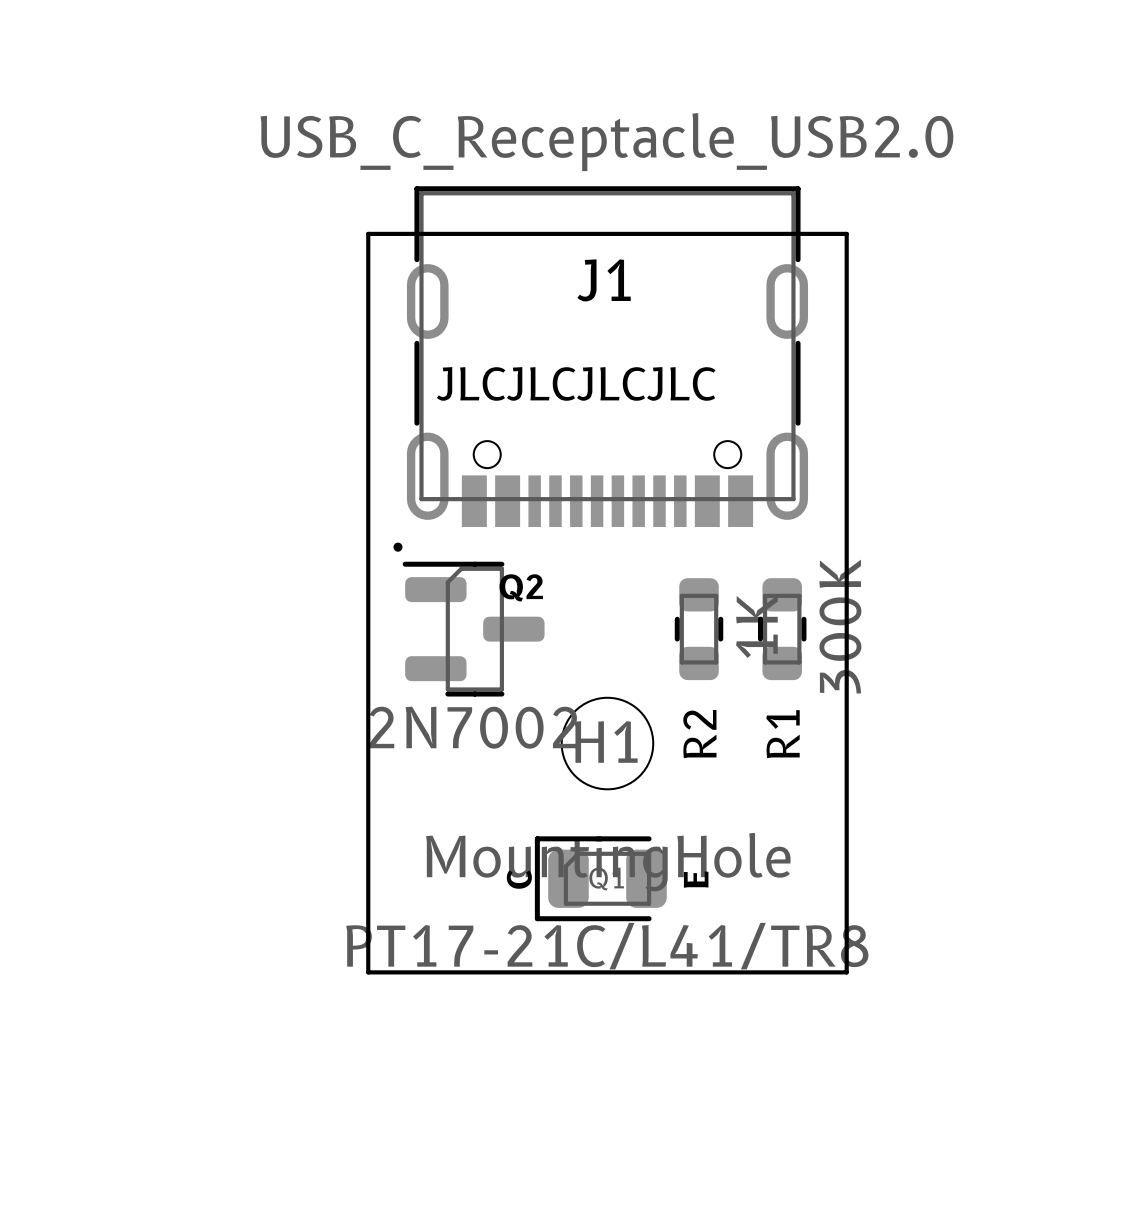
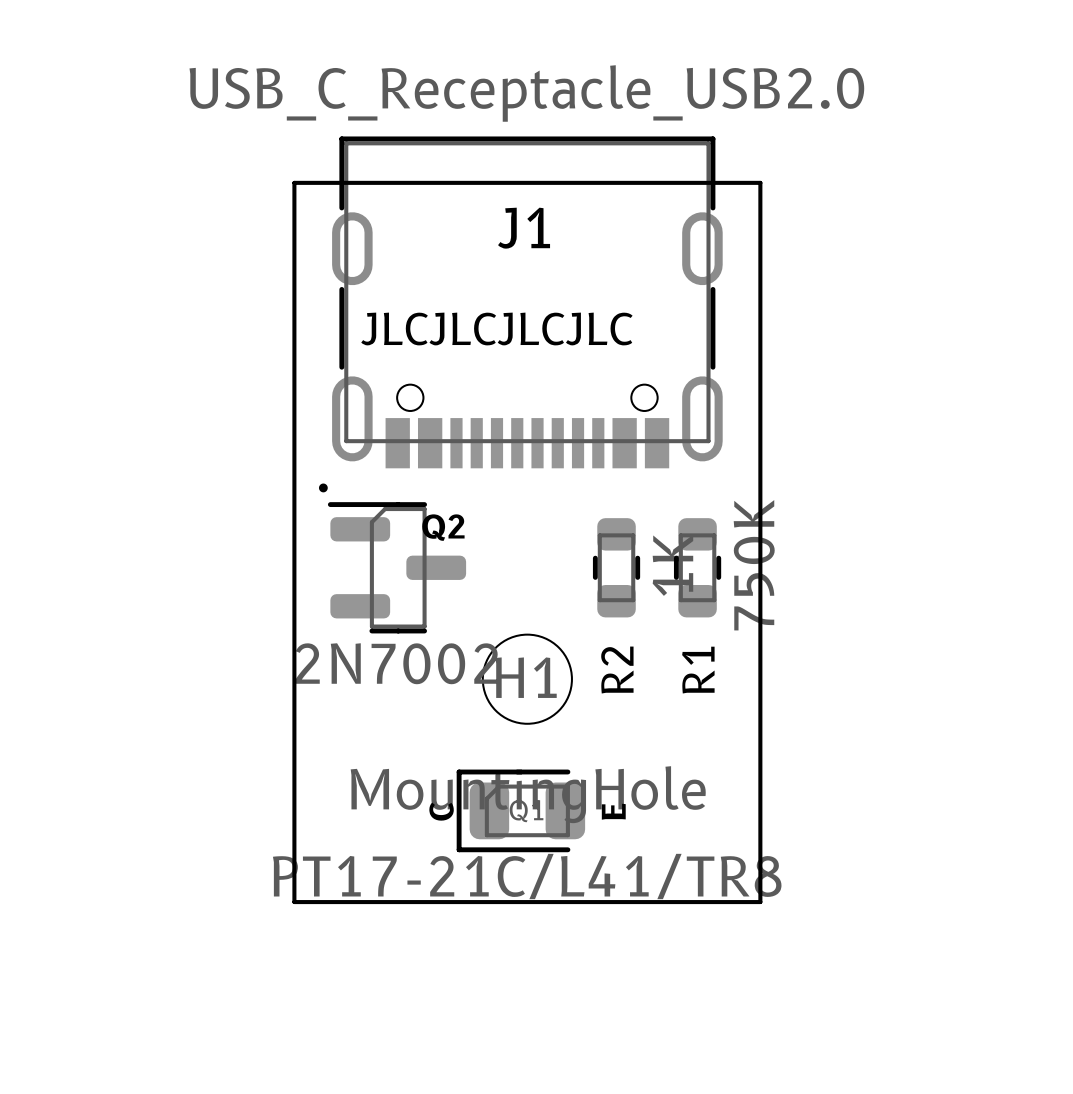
R1 value: 300K (840, 626) -> 750K (754, 565)

